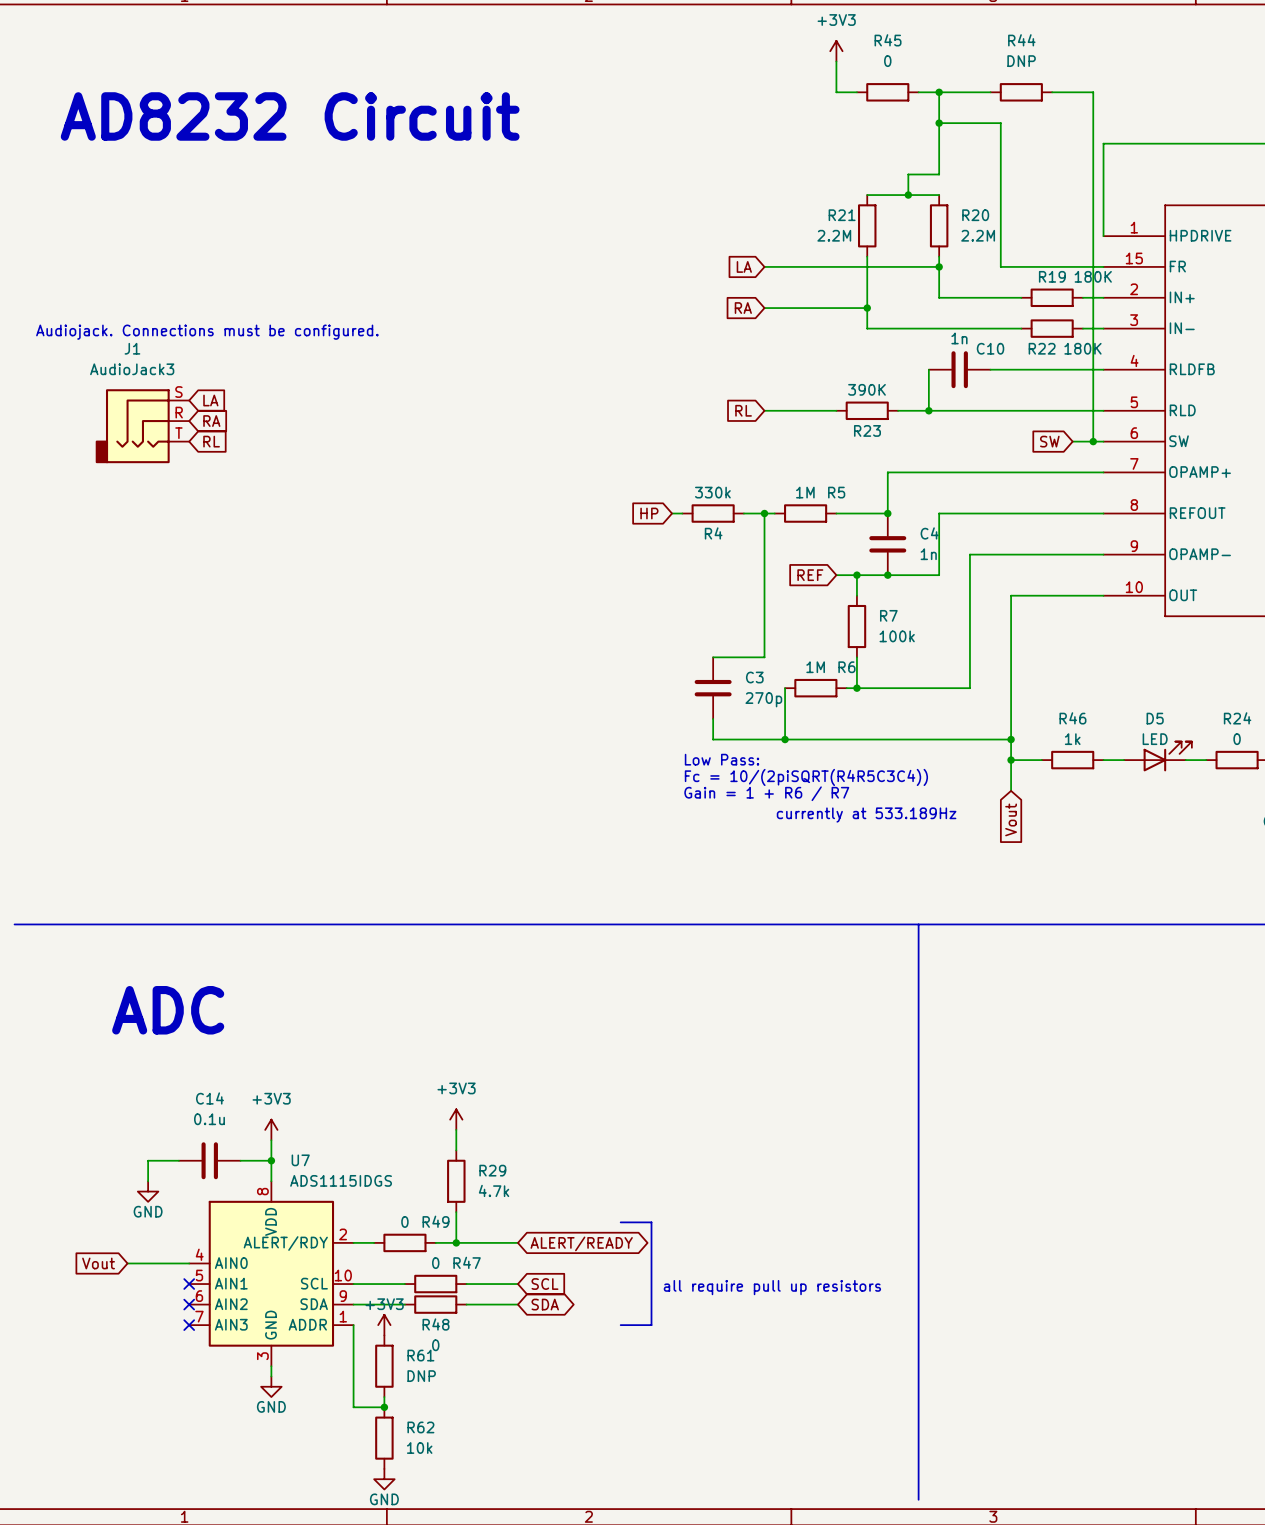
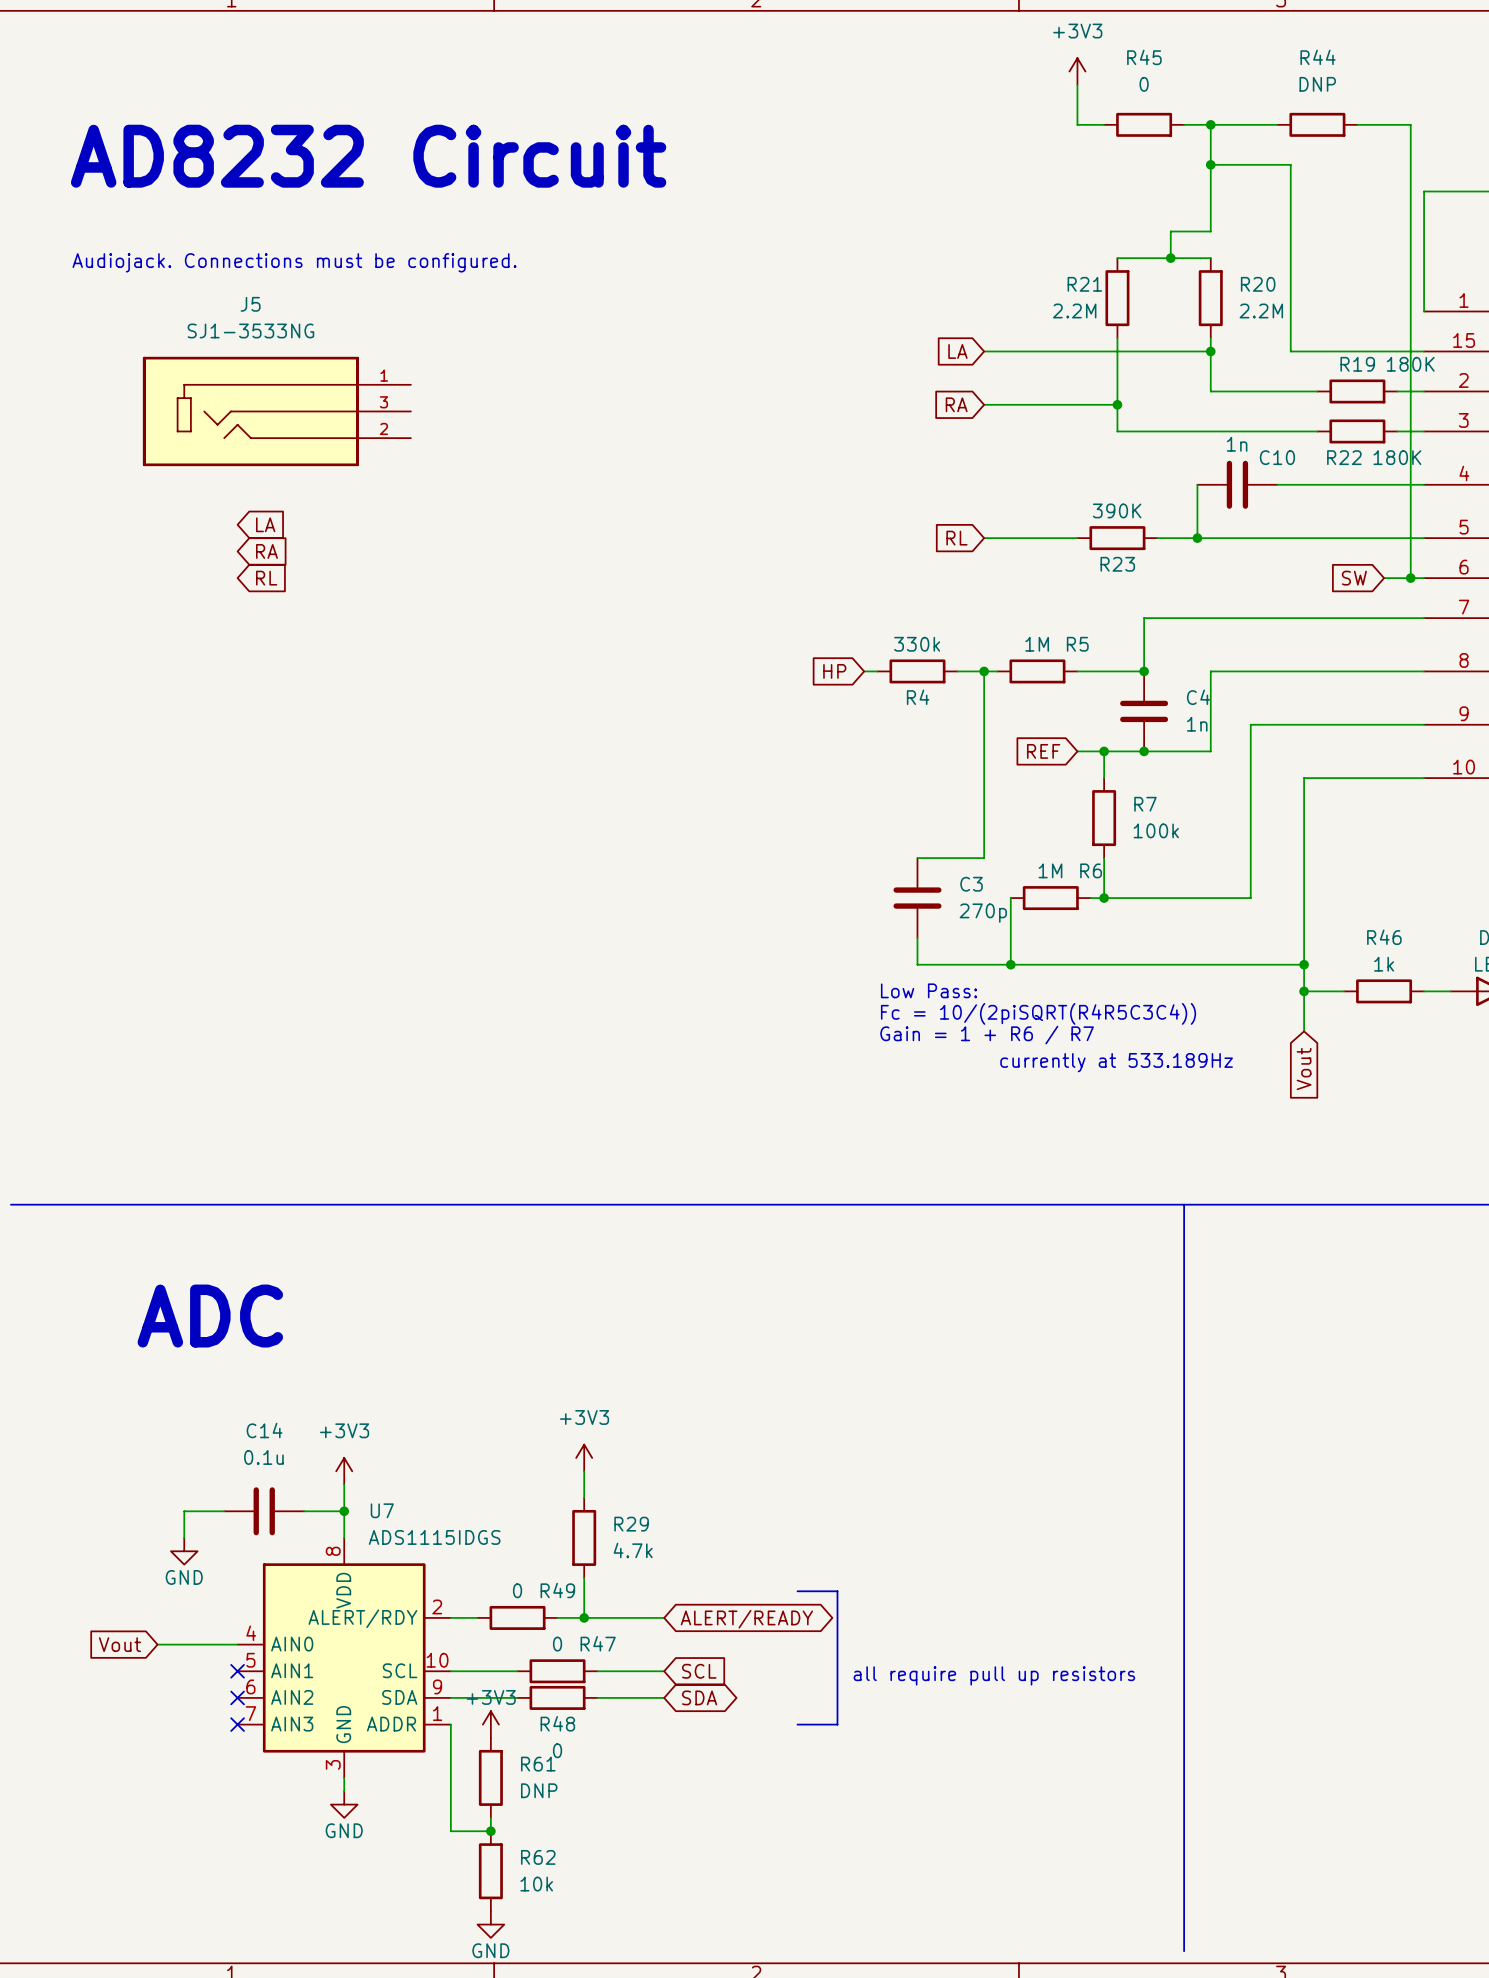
J5: none -> SJ1-3533NG (276, 411)
text position: Audiojack. Connections must be configured. (207, 332) -> Audiojack. Connections must be configured. (294, 262)
J1: AudioJack3 (142, 426) -> none

